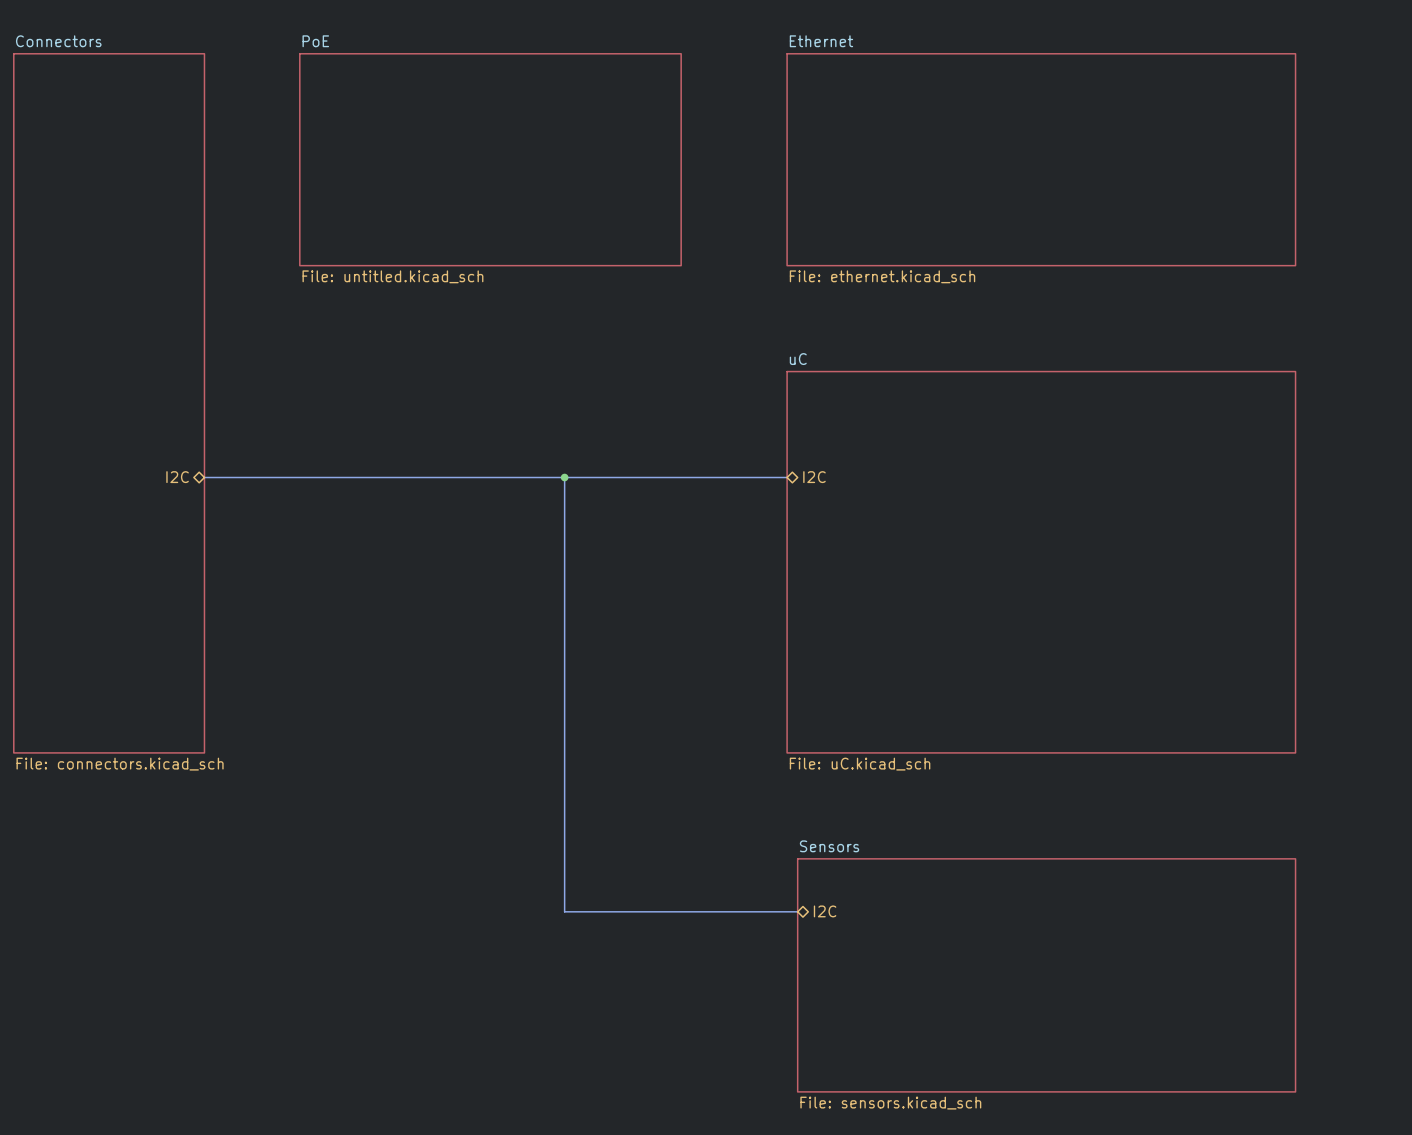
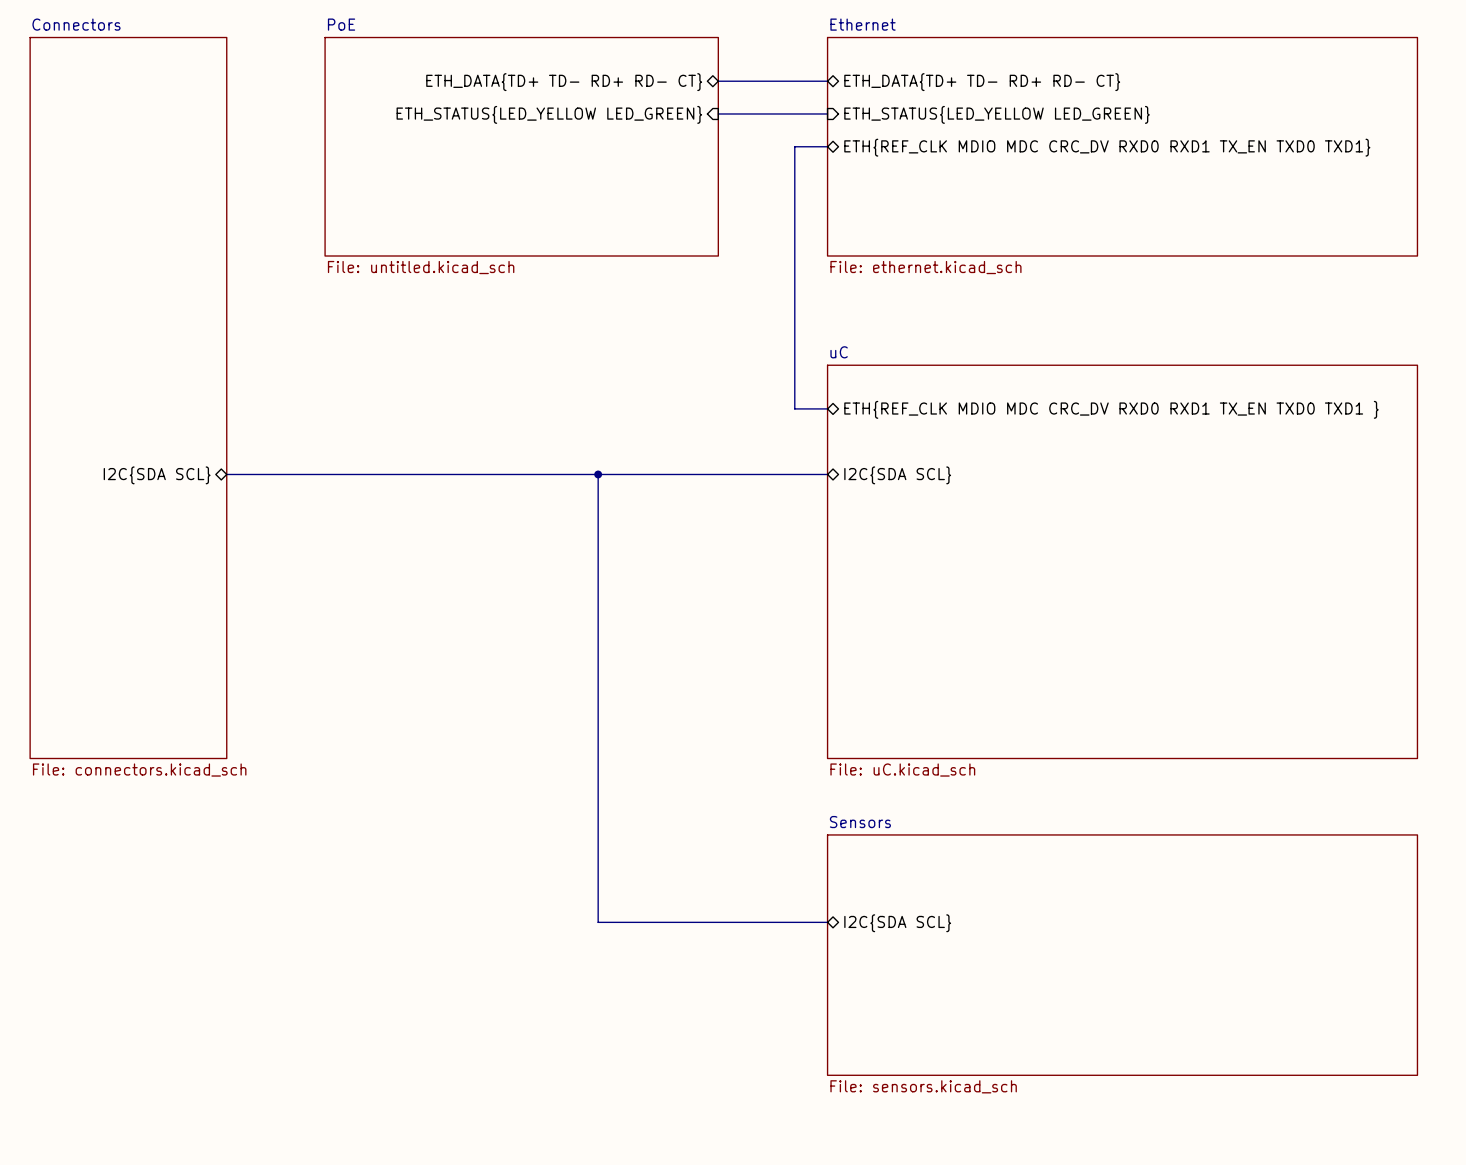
bus: none -> (718, 81) (827, 81)
sheet pin: none -> ETH_DATA{TD+ TD- RD+ RD- CT} (564, 82)
sheet pin: none -> ETH_DATA{TD+ TD- RD+ RD- CT} (982, 82)
bus: none -> (718, 113) (827, 113)
sheet pin: none -> ETH_STATUS{LED_YELLOW LED_GREEN} (549, 114)
sheet pin: none -> ETH_STATUS{LED_YELLOW LED_GREEN} (997, 114)
bus: none -> (827, 146) (794, 146) (794, 408) (827, 408)
sheet Ethernet: File: ethernet.kicad_sch (1041, 159) -> none
sheet Ethernet: none -> File: ethernet.kicad_sch (1122, 146)
sheet pin: none -> ETH{REF_CLK MDIO MDC CRC_DV RXD0 RXD1 TX_EN TXD0 TXD1} (1107, 147)
sheet pin: none -> ETH{REF_CLK MDIO MDC CRC_DV RXD0 RXD1 TX_EN TXD0 TXD1 } (1111, 409)
hierarchical label: I2C (177, 477) -> none
hierarchical label: I2C (814, 477) -> none
sheet pin: none -> I2C{SDA SCL} (157, 475)
sheet pin: none -> I2C{SDA SCL} (897, 475)
sheet uC: File: uC.kicad_sch (1041, 562) -> none
sheet uC: none -> File: uC.kicad_sch (1122, 561)
bus: (787, 911) (797, 911) -> none
hierarchical label: I2C (825, 911) -> none
sheet pin: none -> I2C{SDA SCL} (897, 923)
sheet Sensors: none -> File: sensors.kicad_sch (1122, 955)
sheet Sensors: File: sensors.kicad_sch (1046, 975) -> none

